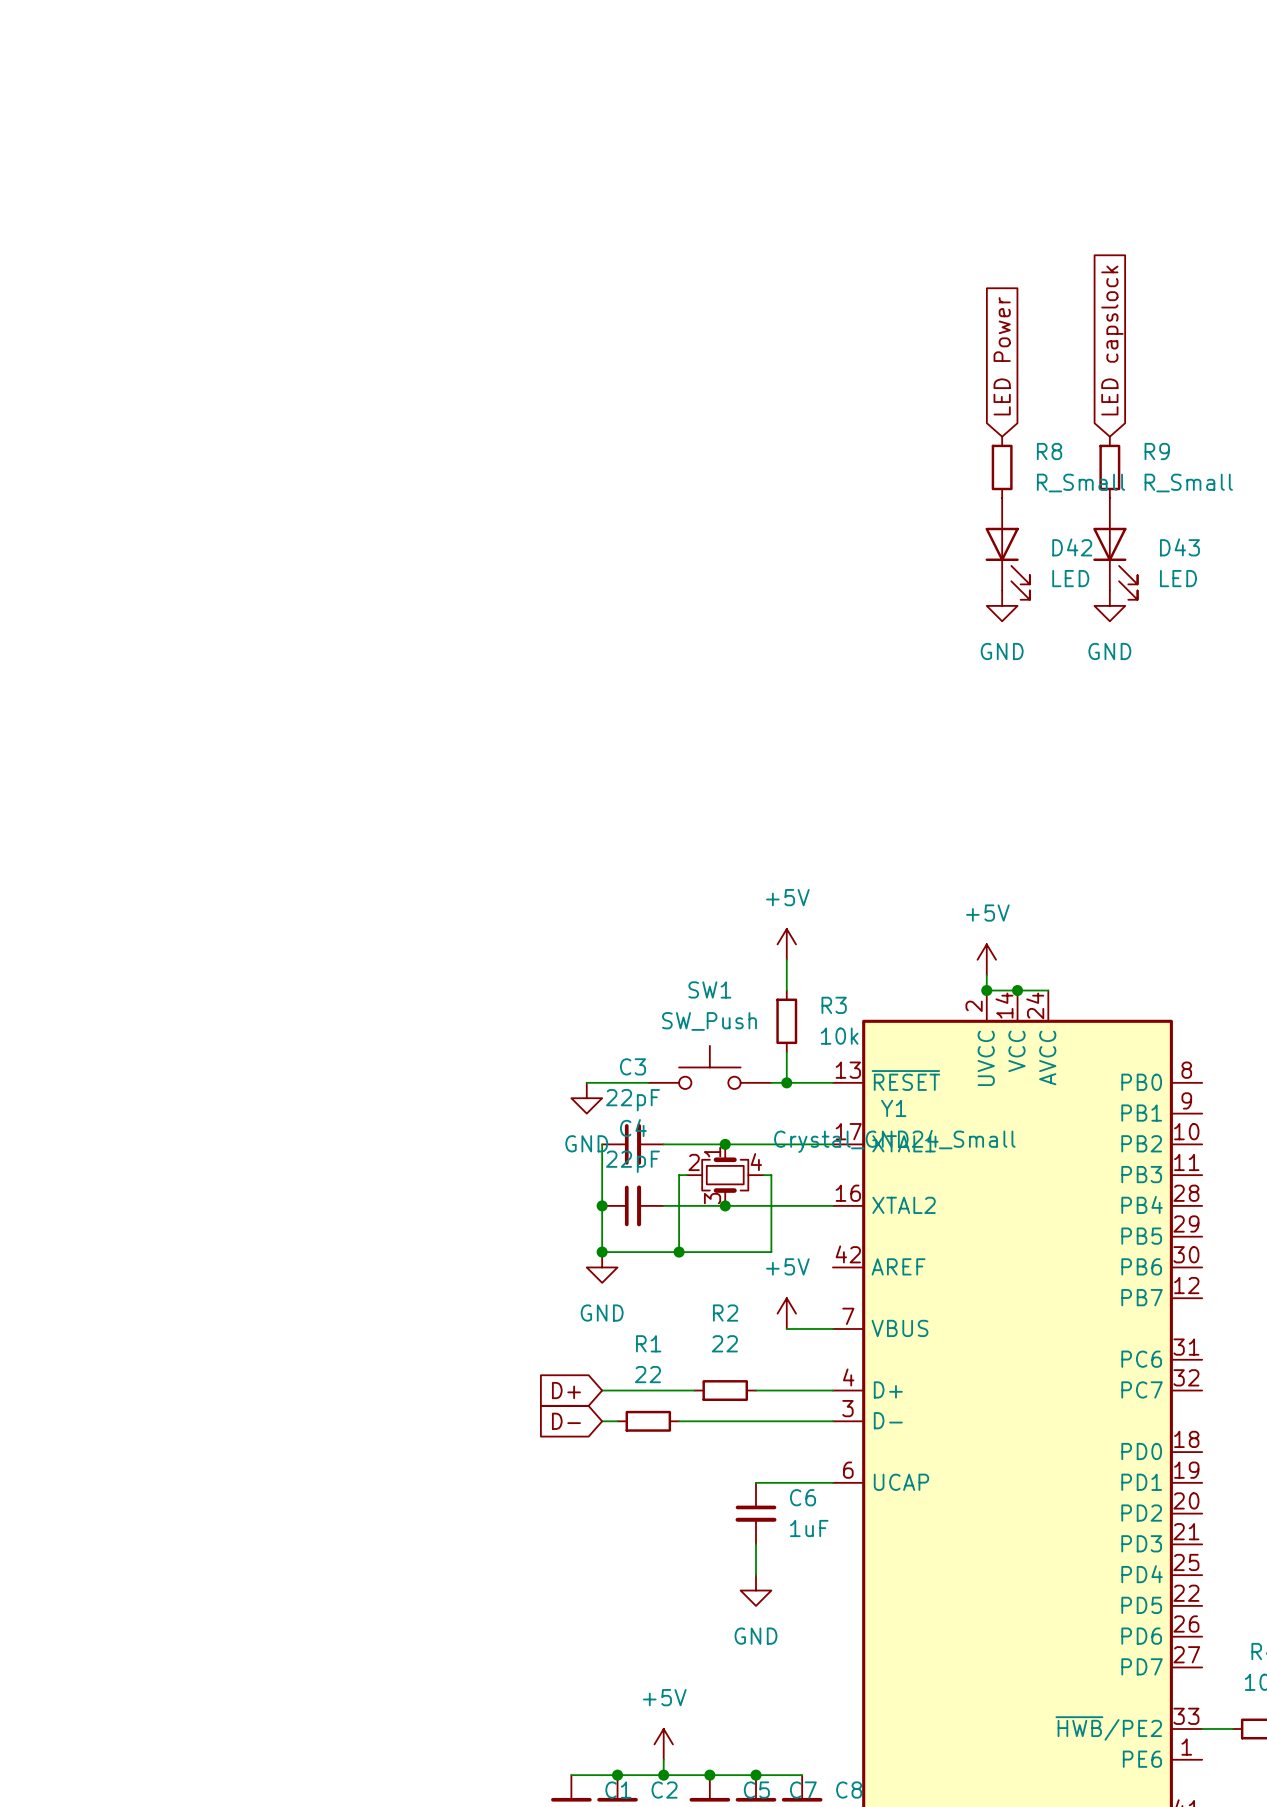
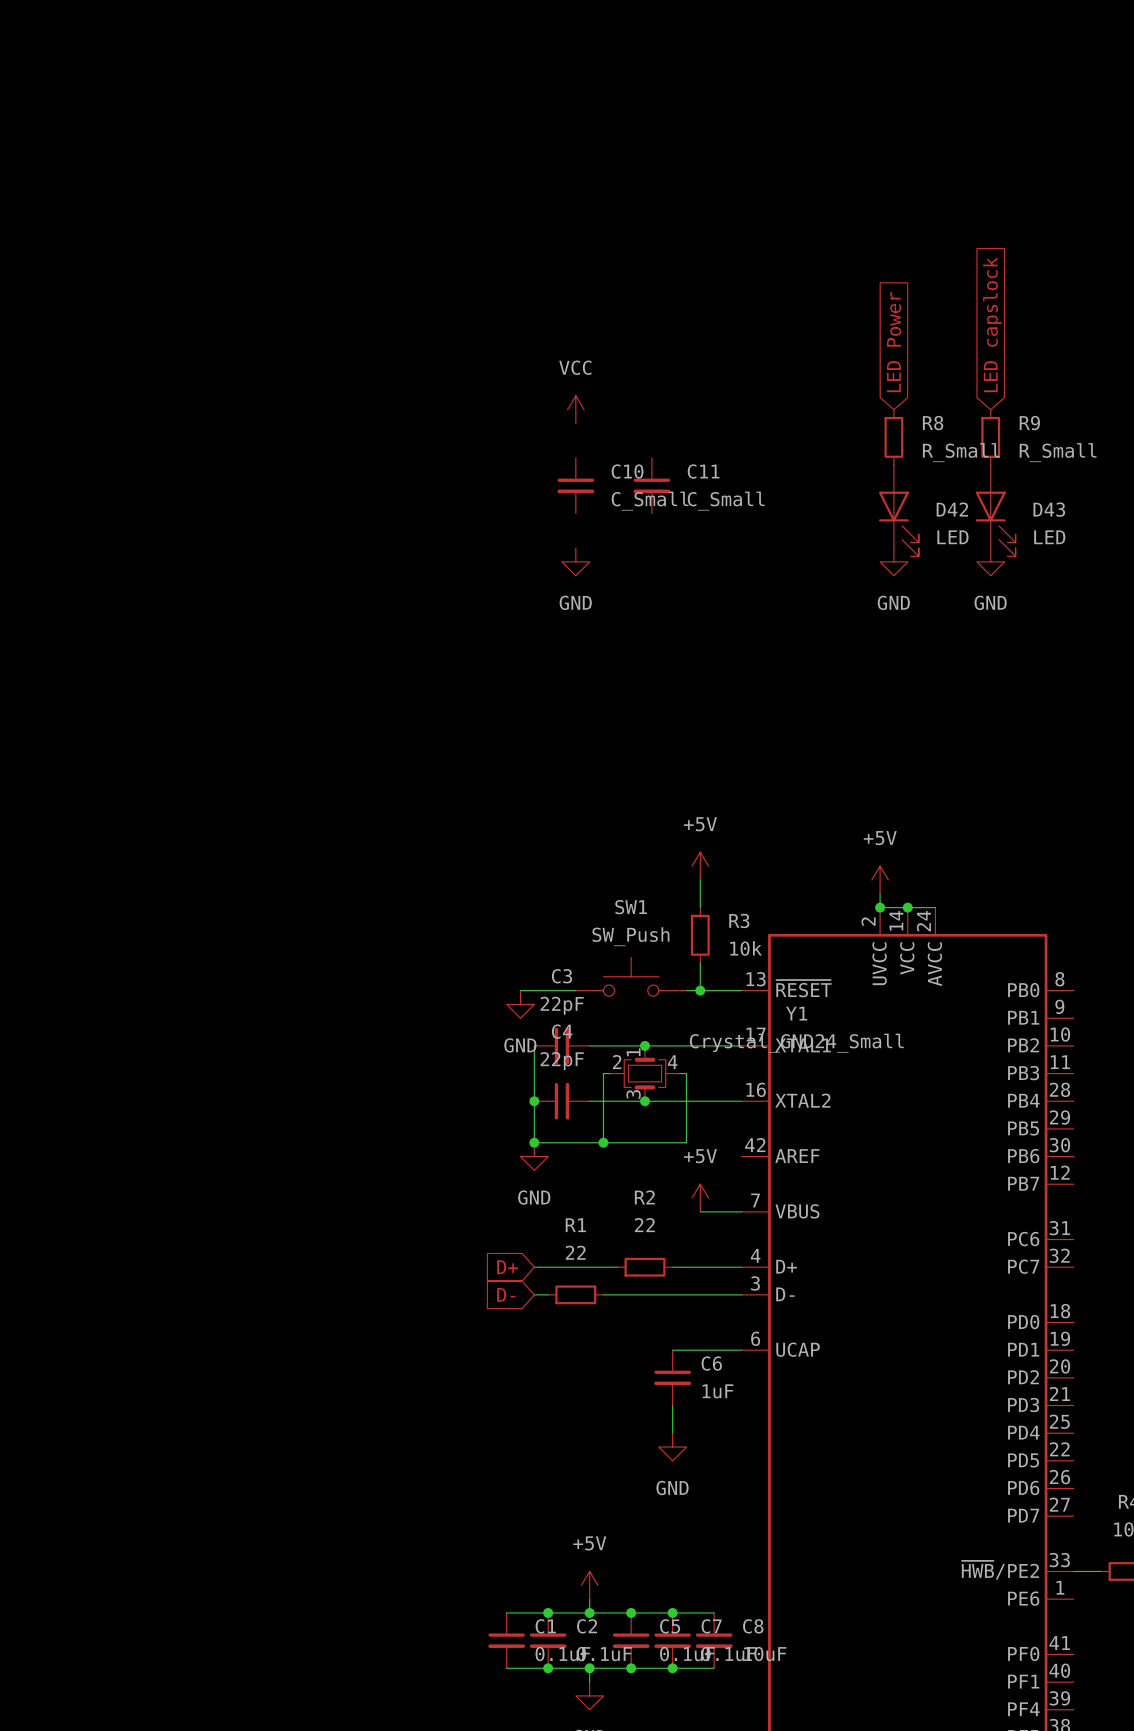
power symbol: none -> VCC (575, 409)
C10: none -> C_Small (575, 485)
C11: none -> C_Small (651, 485)
power symbol: none -> GND (575, 561)

